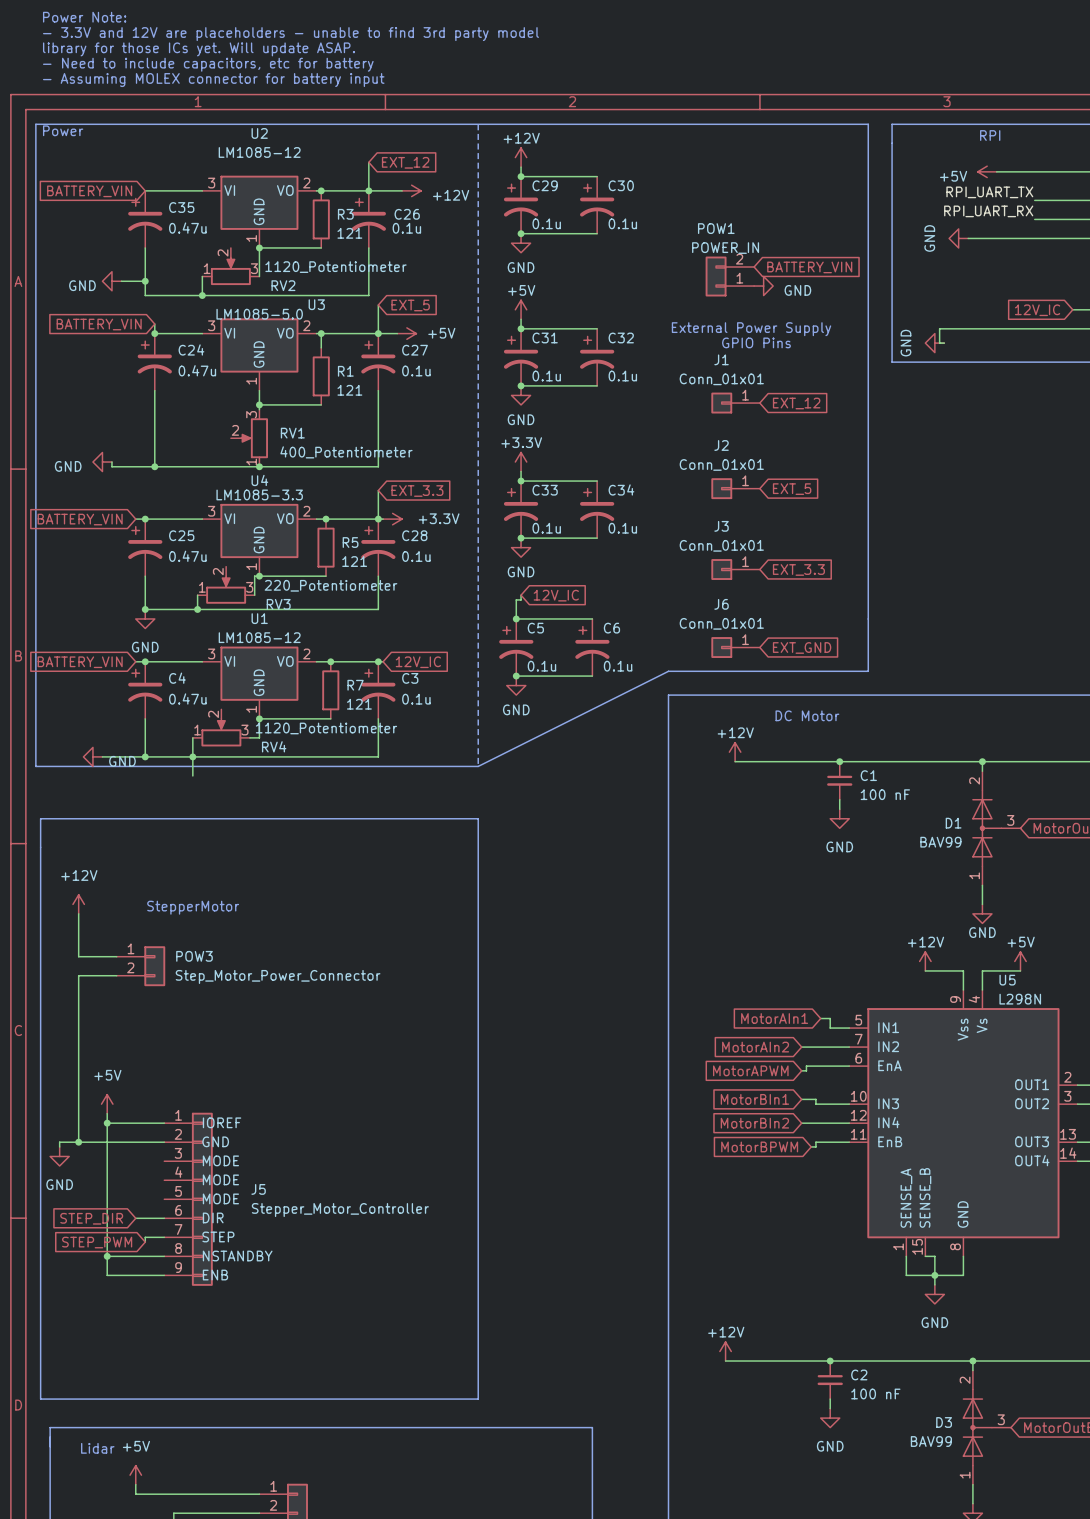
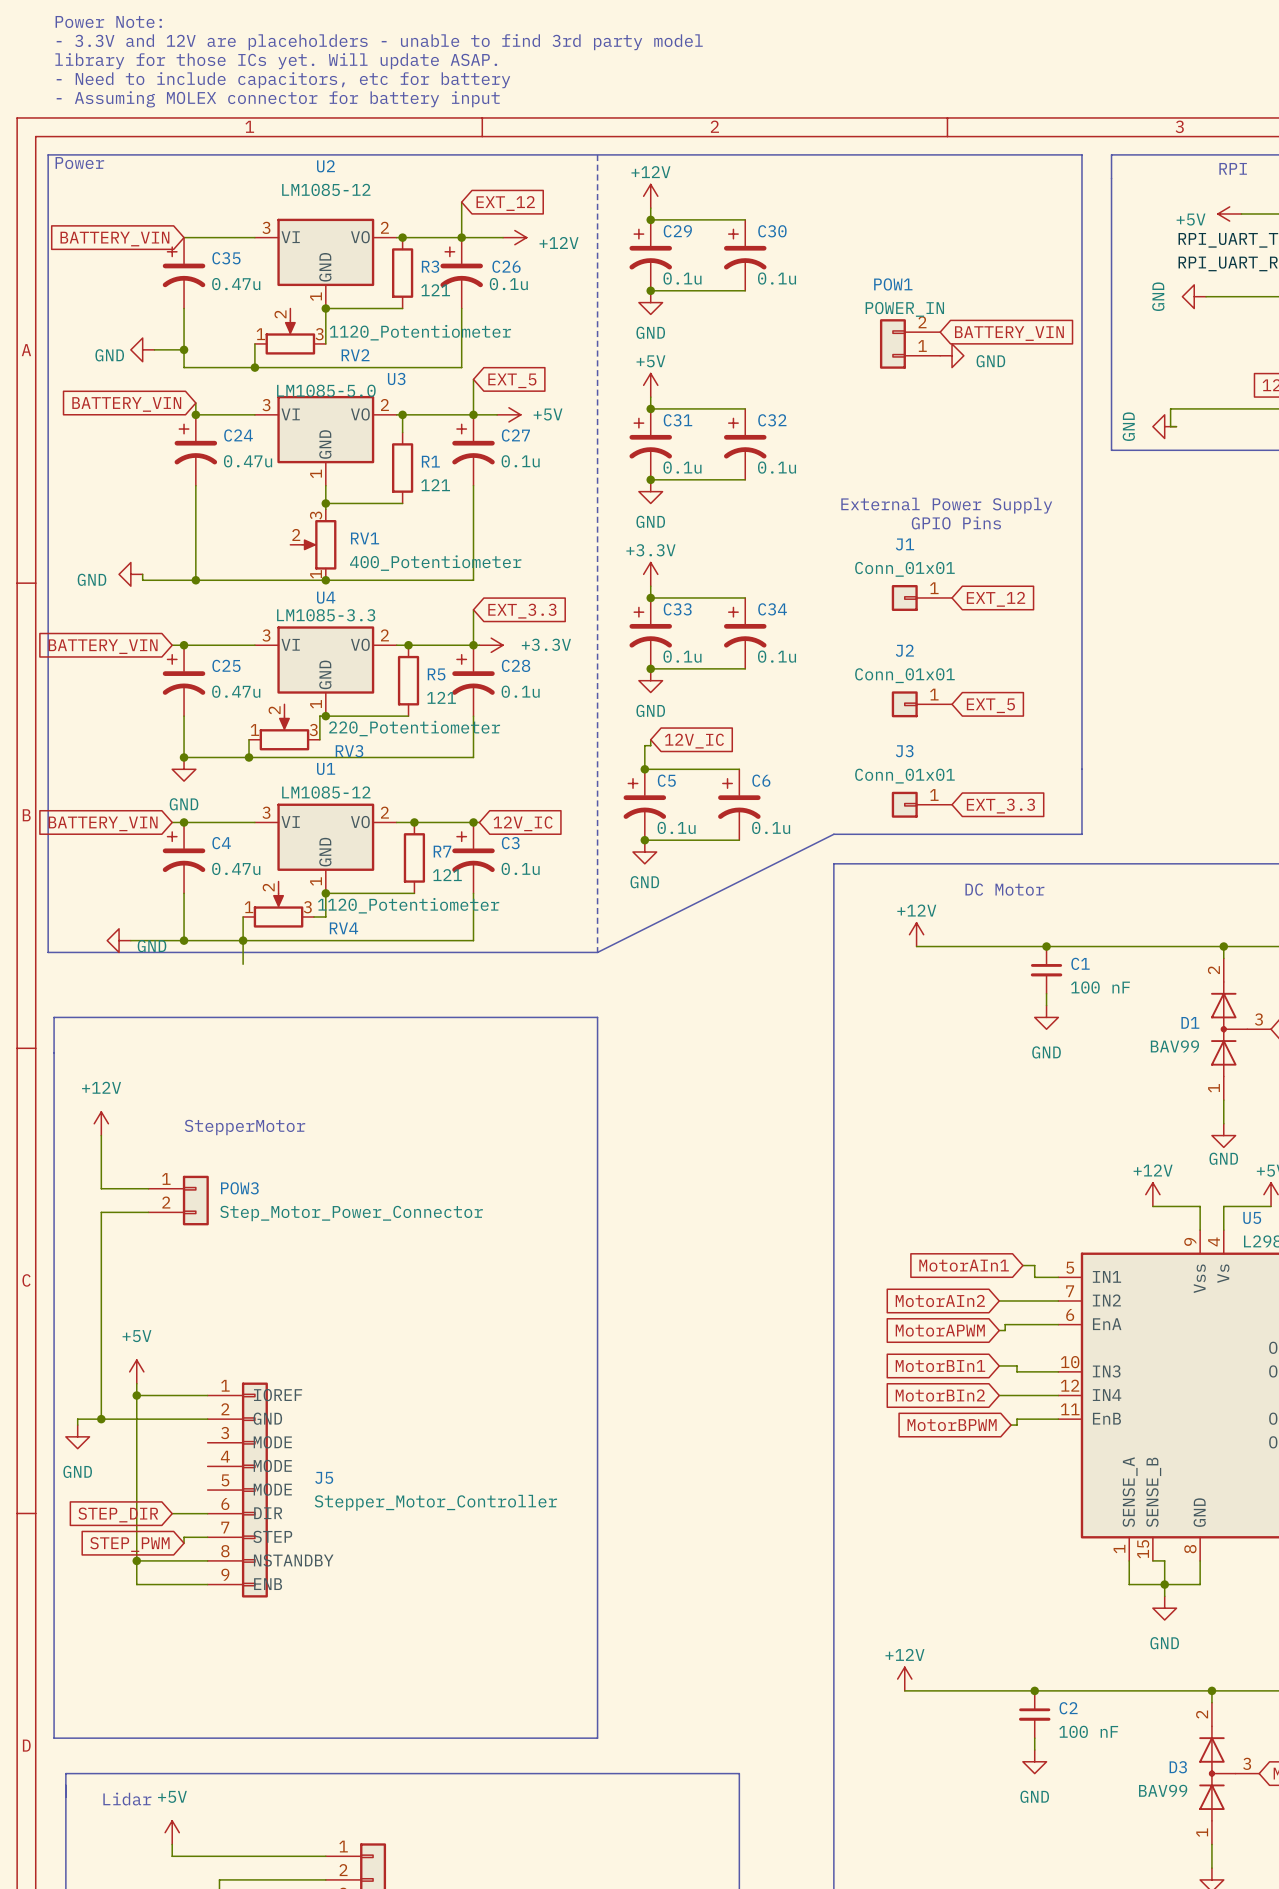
text position: External Power Supply (751, 329) -> External Power Supply (946, 505)
text position: GPIO Pins (756, 342) -> GPIO Pins (956, 523)
J1 position: (735, 403) -> (921, 597)
global label position: EXT_12 (796, 403) -> EXT_12 (996, 599)
J2 position: (735, 488) -> (921, 704)
global label: EXT_5 (792, 489) -> none
J3 position: (735, 569) -> (921, 804)
global label: EXT_3.3 (798, 569) -> EXT_5 (990, 705)
J6: Conn_01x01 (735, 647) -> none
global label: EXT_GND (802, 647) -> EXT_3.3 (1000, 806)

